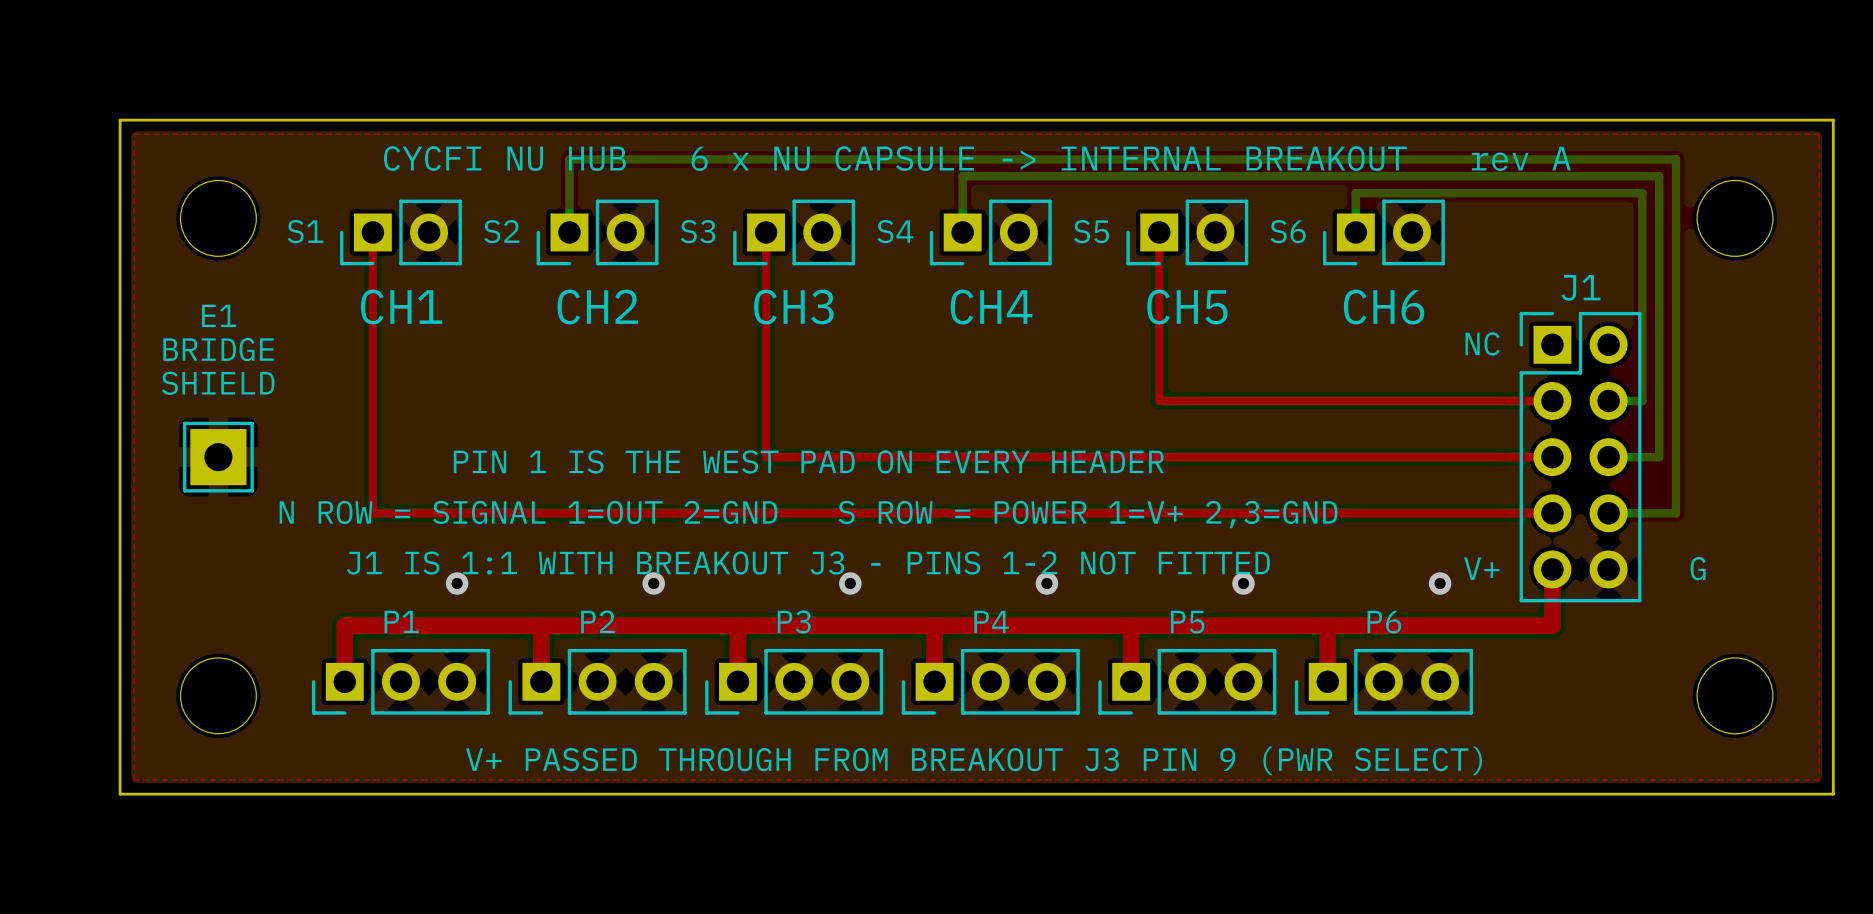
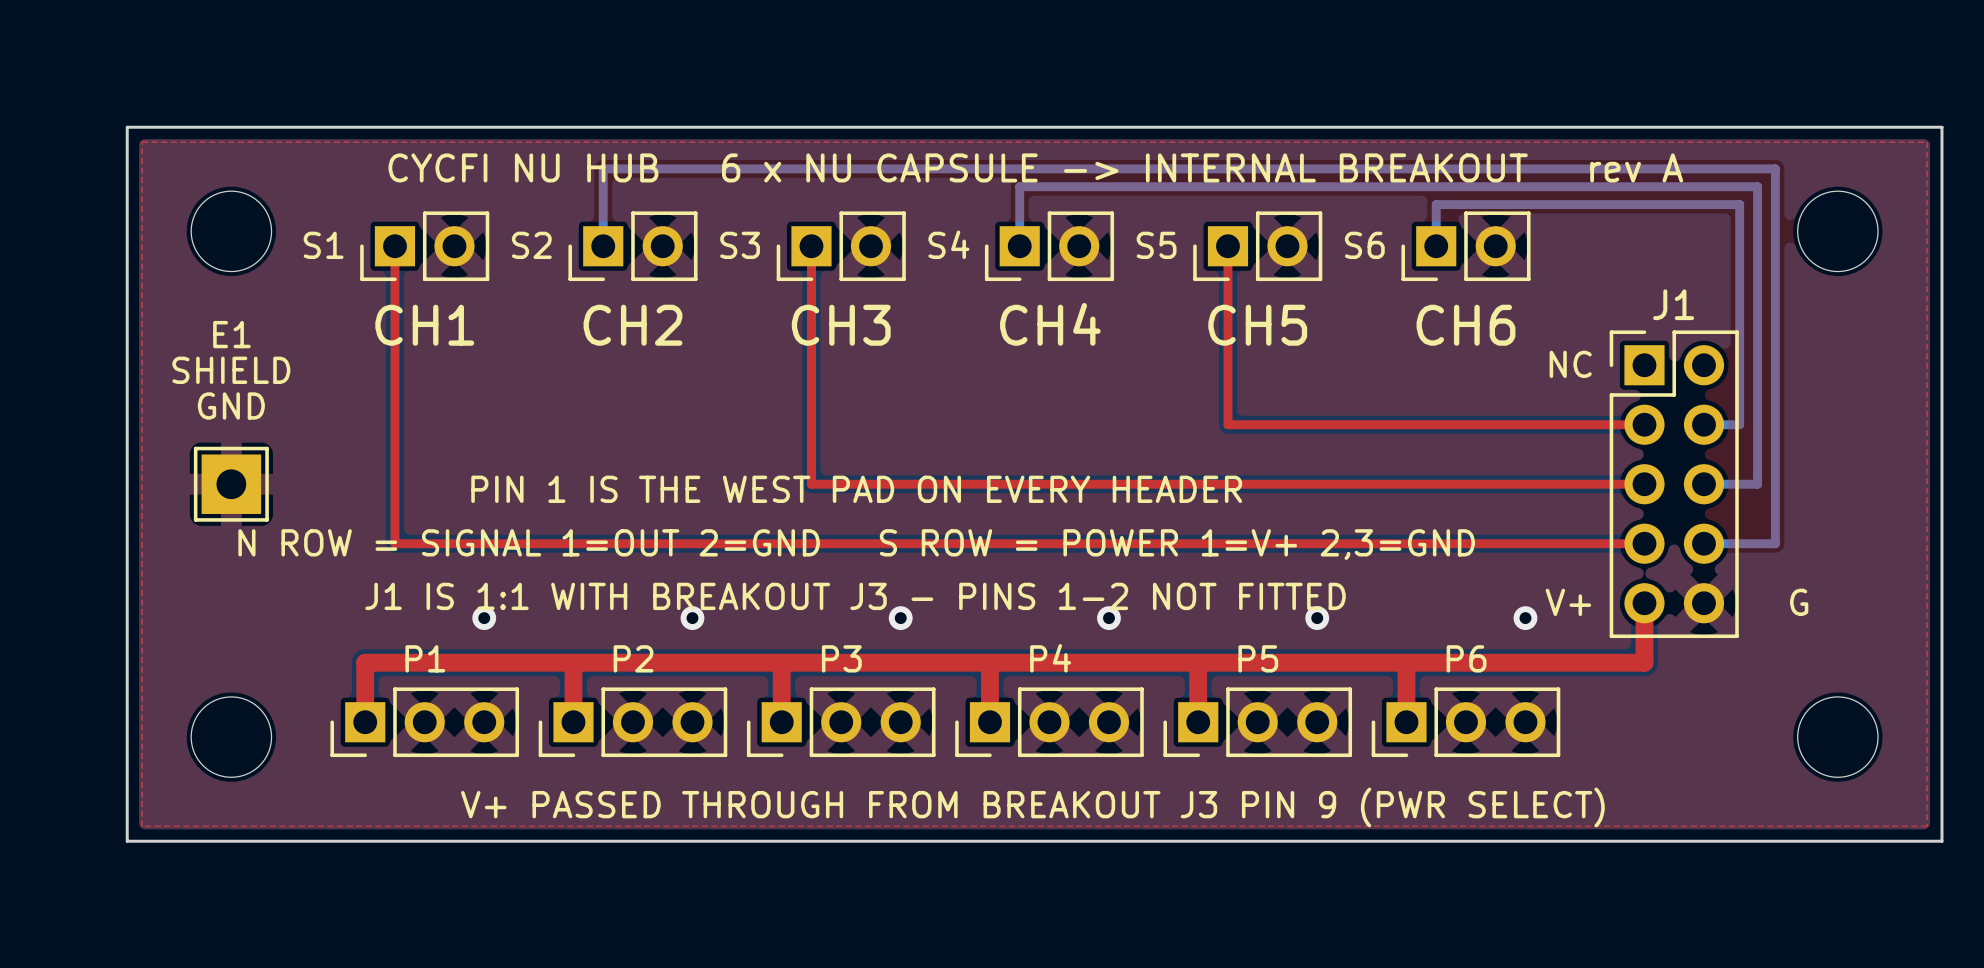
text: BRIDGE (218, 349) -> SHIELD (231, 370)
text: SHIELD (218, 383) -> GND (231, 405)

